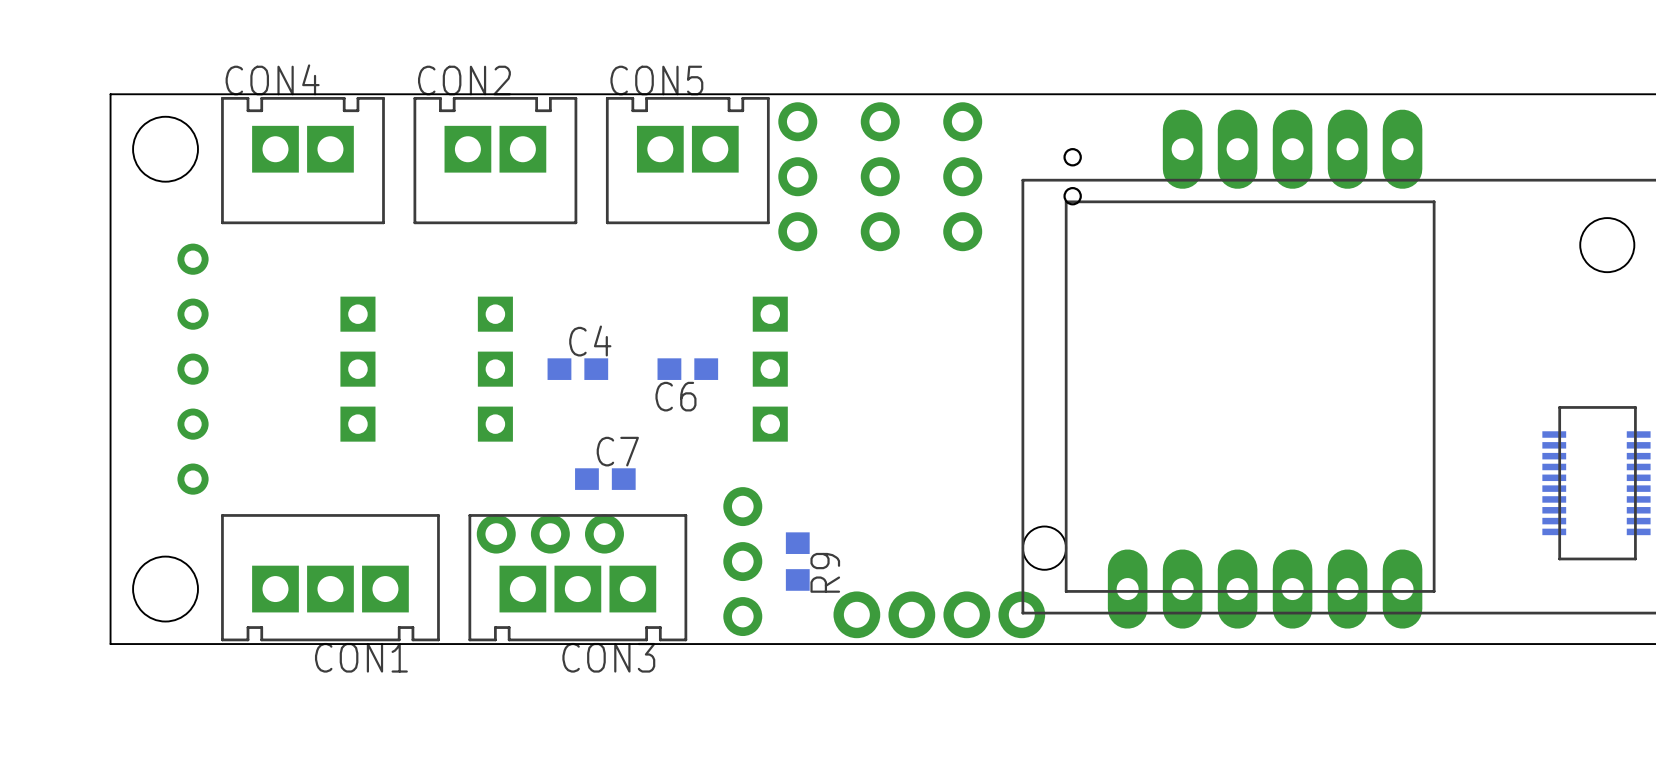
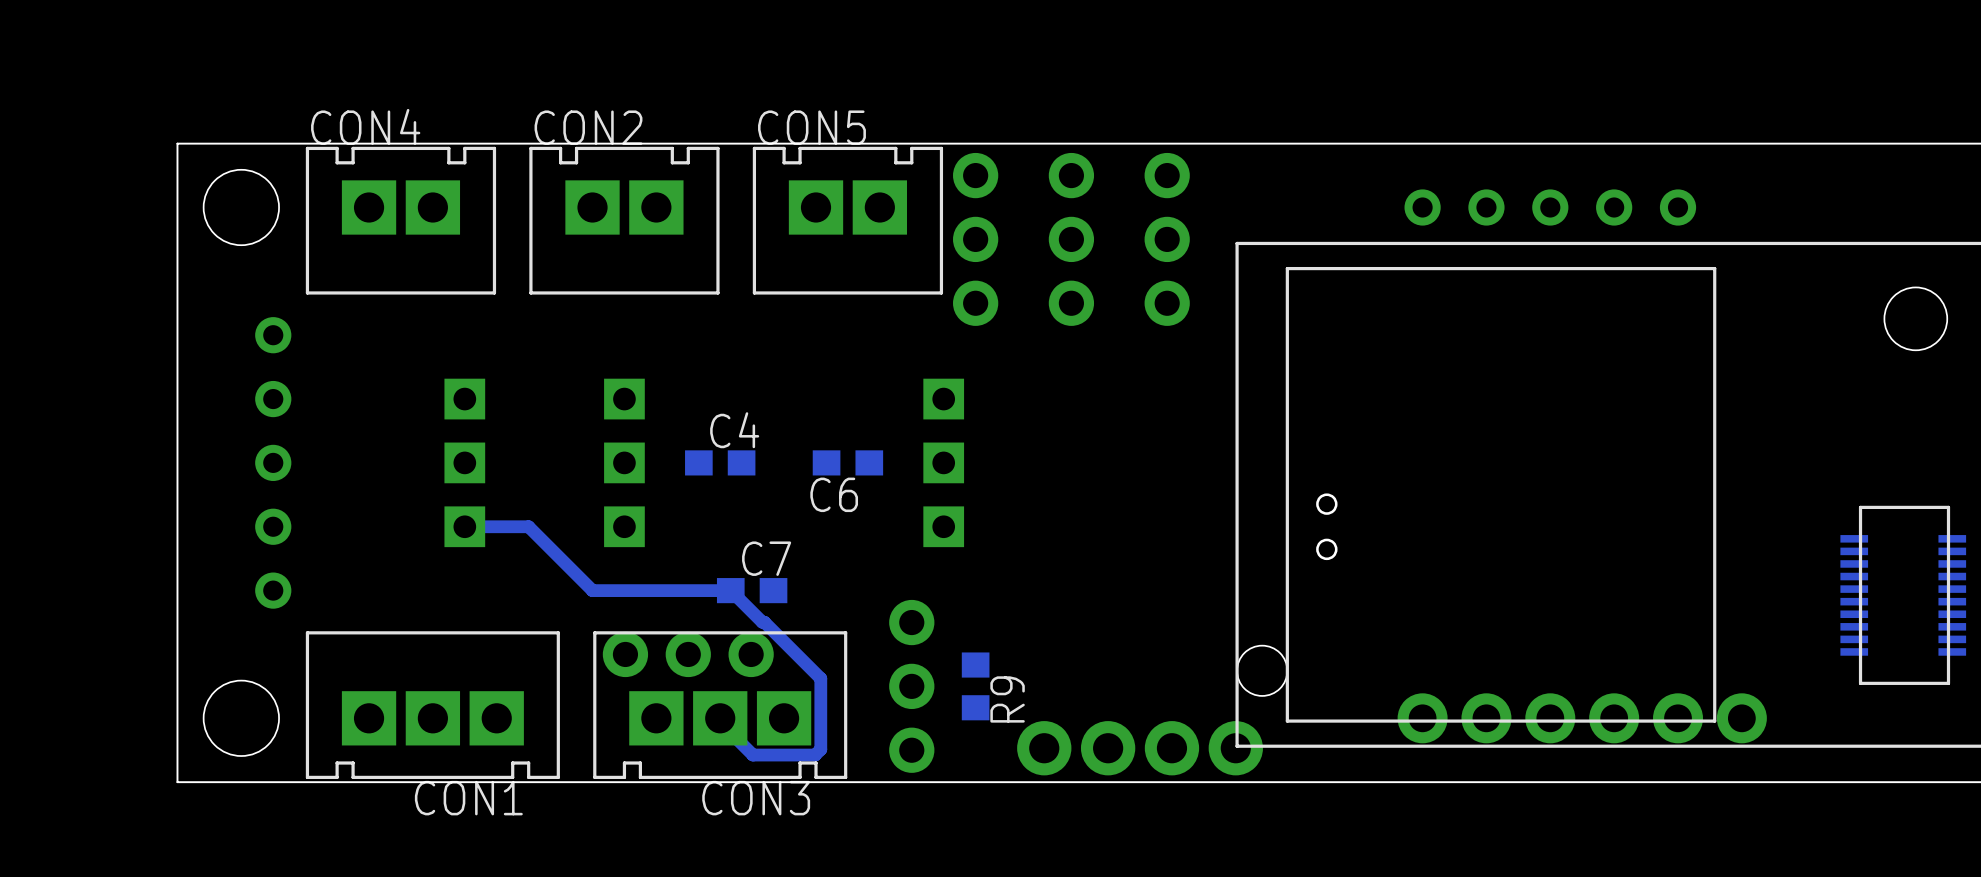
part footprint: [1162, 109, 1423, 189] -> [1404, 189, 1697, 226]
part position: (1072, 176) -> (1326, 526)
track: none -> (464, 526) (528, 526) (592, 590) (730, 590) (820, 678) (820, 749) (815, 755) (752, 755) (720, 722) (720, 718)
part: (1265, 589) -> none
part: none -> (1582, 718)

